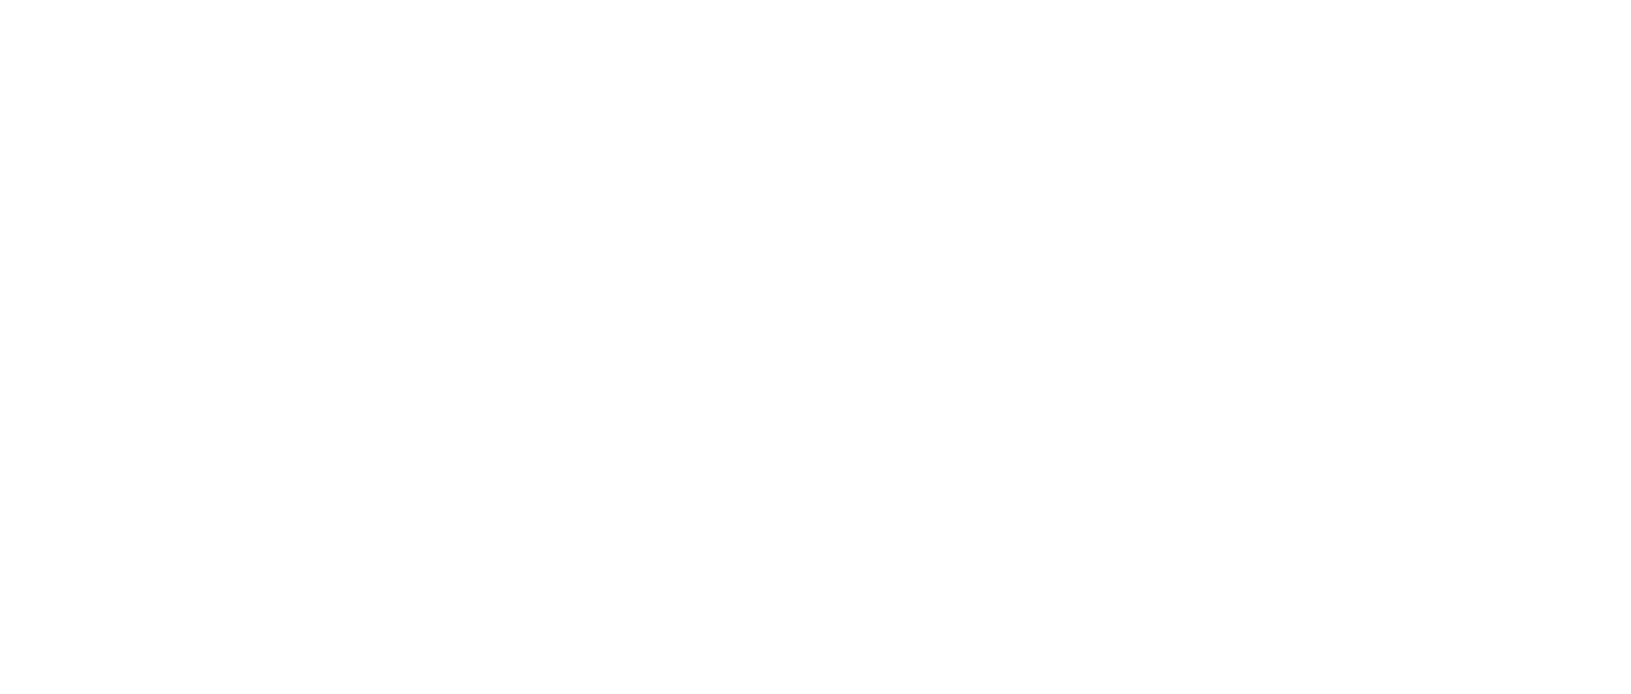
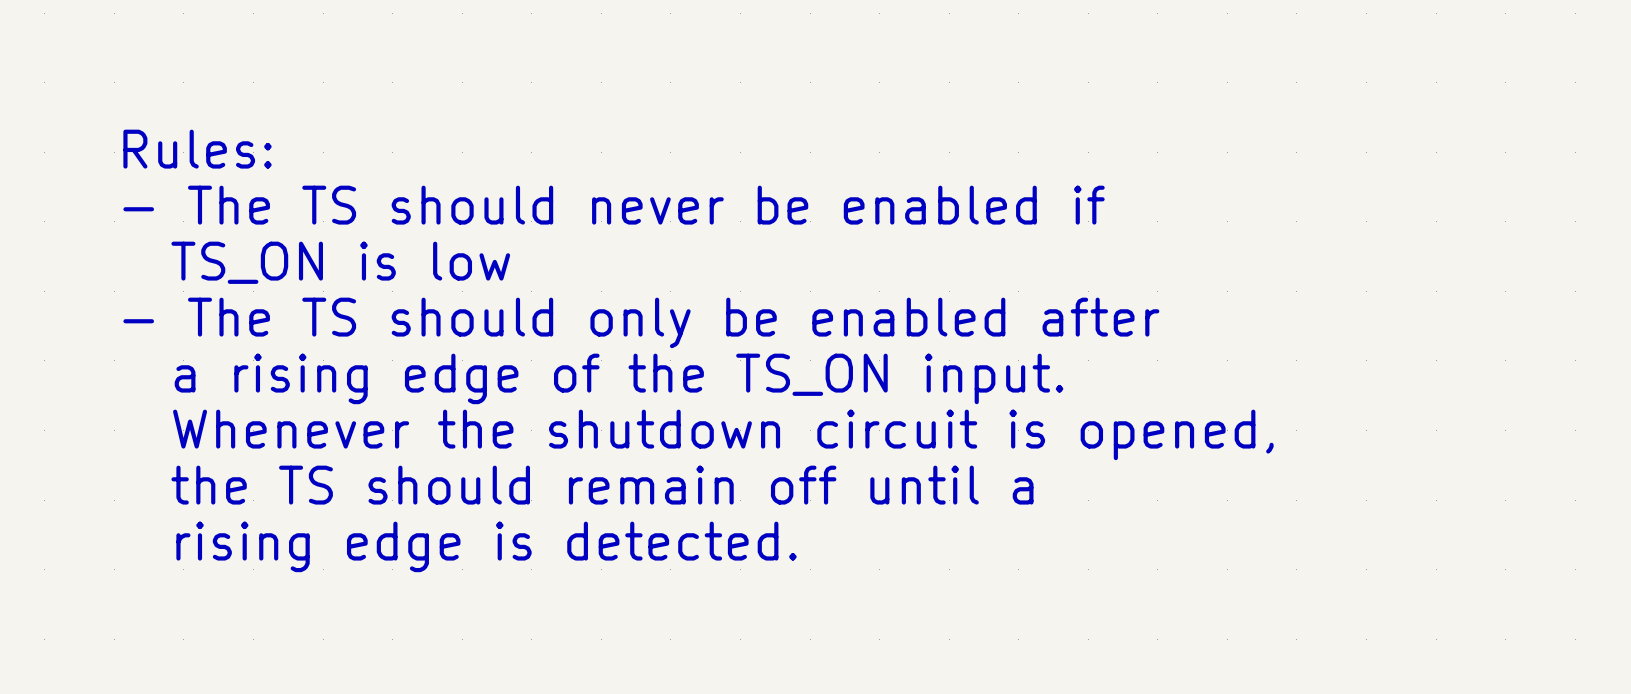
text: none -> Rules: (197, 149)
text: none -> - The TS should never be enabled if (614, 205)
text: none -> TS_ON is low (340, 262)
text: none -> - The TS should only be enabled after (641, 322)
text: none -> a rising edge of the TS_ON input. (619, 378)
text: none -> Whenever the shutdown circuit is opened, (723, 434)
text: none -> the TS should remain off until a (602, 485)
text: none -> rising edge is detected. (486, 546)

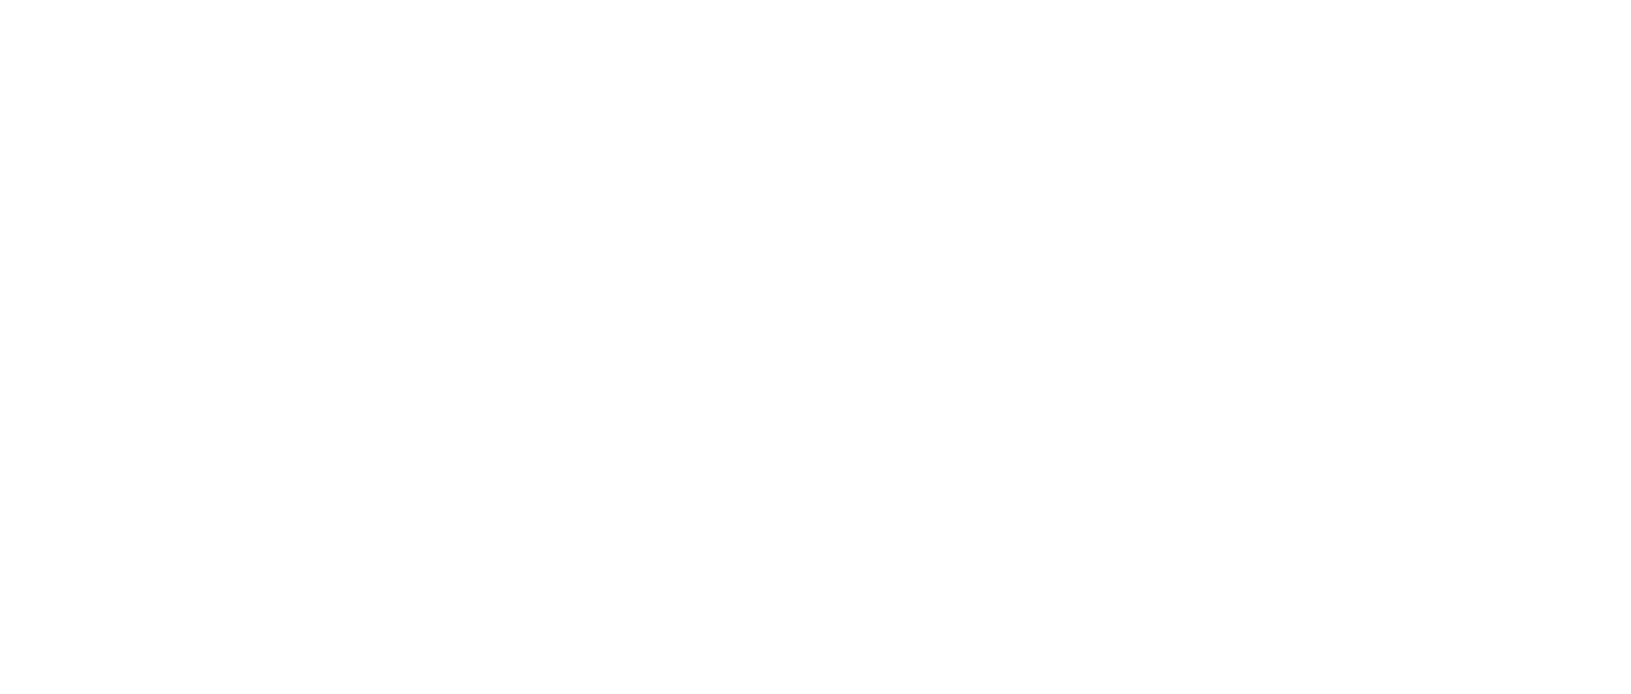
text: Rules: (197, 149) -> none
text: - The TS should never be enabled if (614, 205) -> none
text: TS_ON is low (340, 262) -> none
text: - The TS should only be enabled after (641, 322) -> none
text: a rising edge of the TS_ON input. (619, 378) -> none
text: Whenever the shutdown circuit is opened, (723, 434) -> none
text: the TS should remain off until a (602, 485) -> none
text: rising edge is detected. (486, 546) -> none

